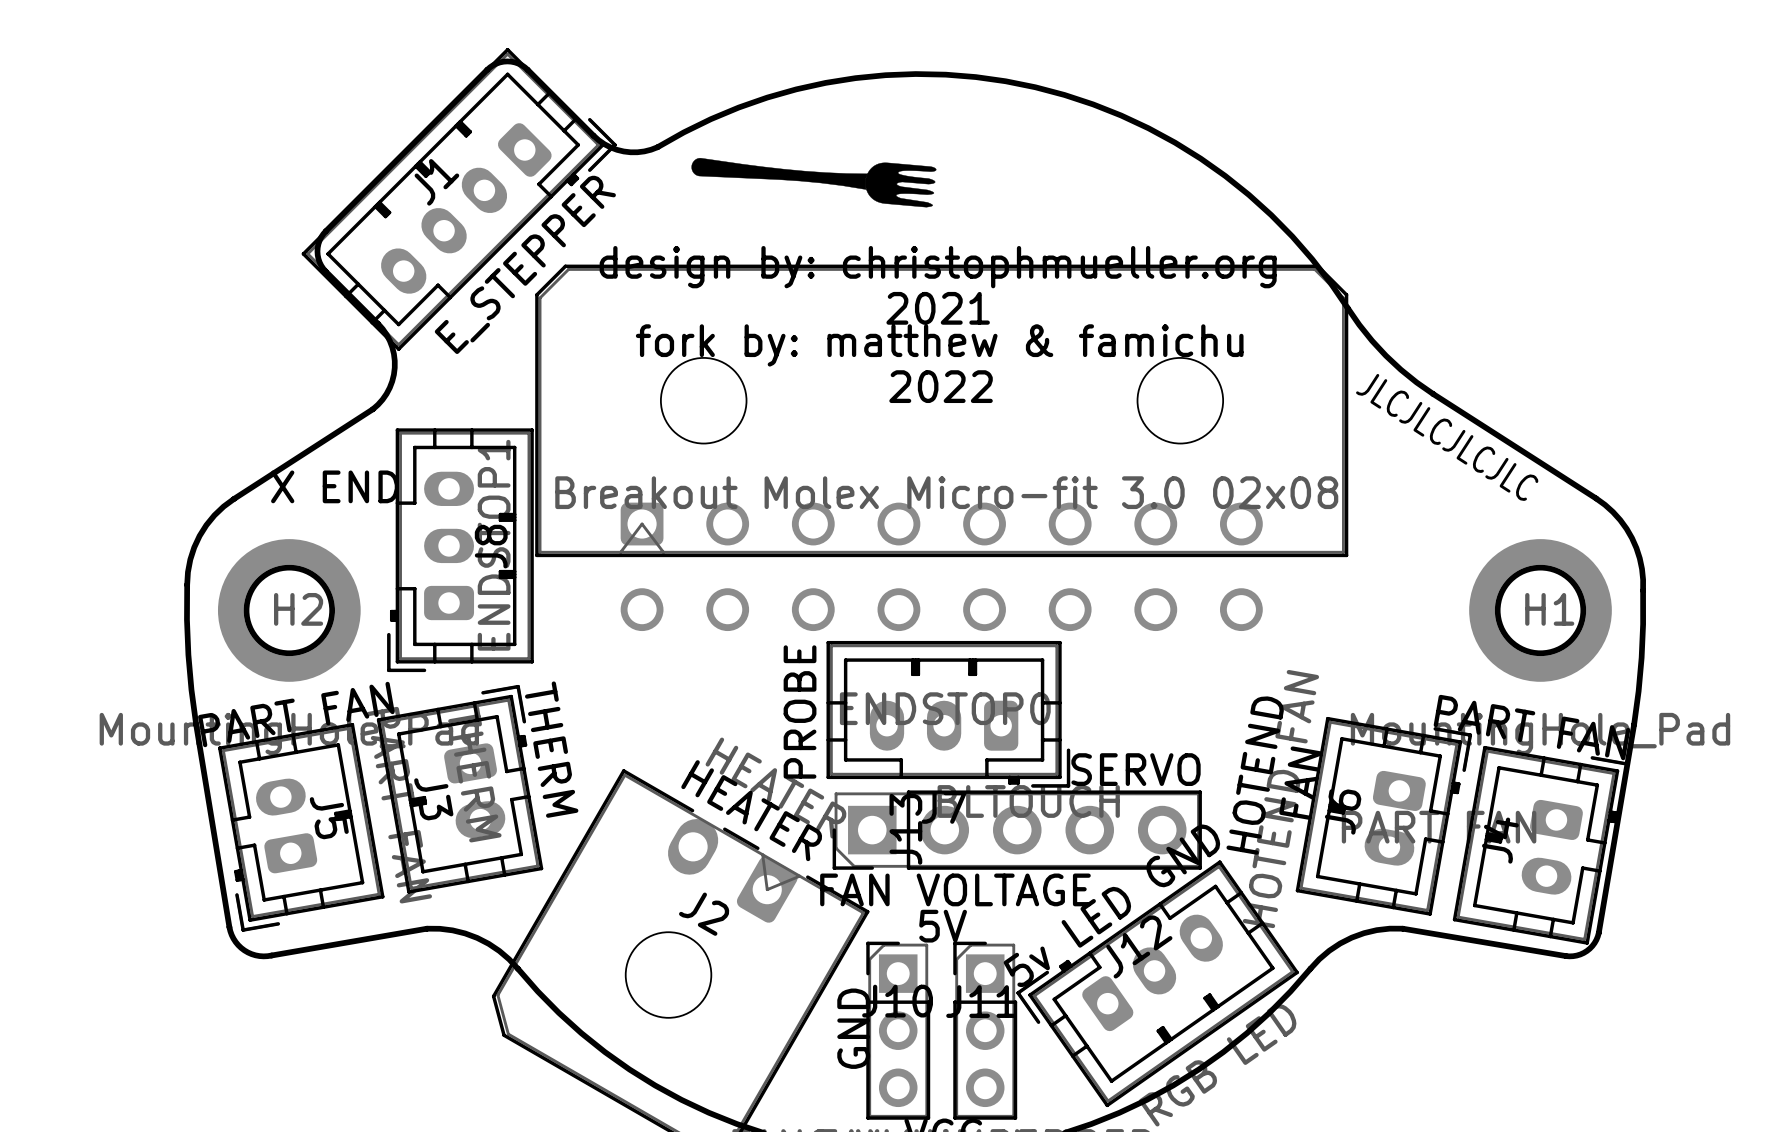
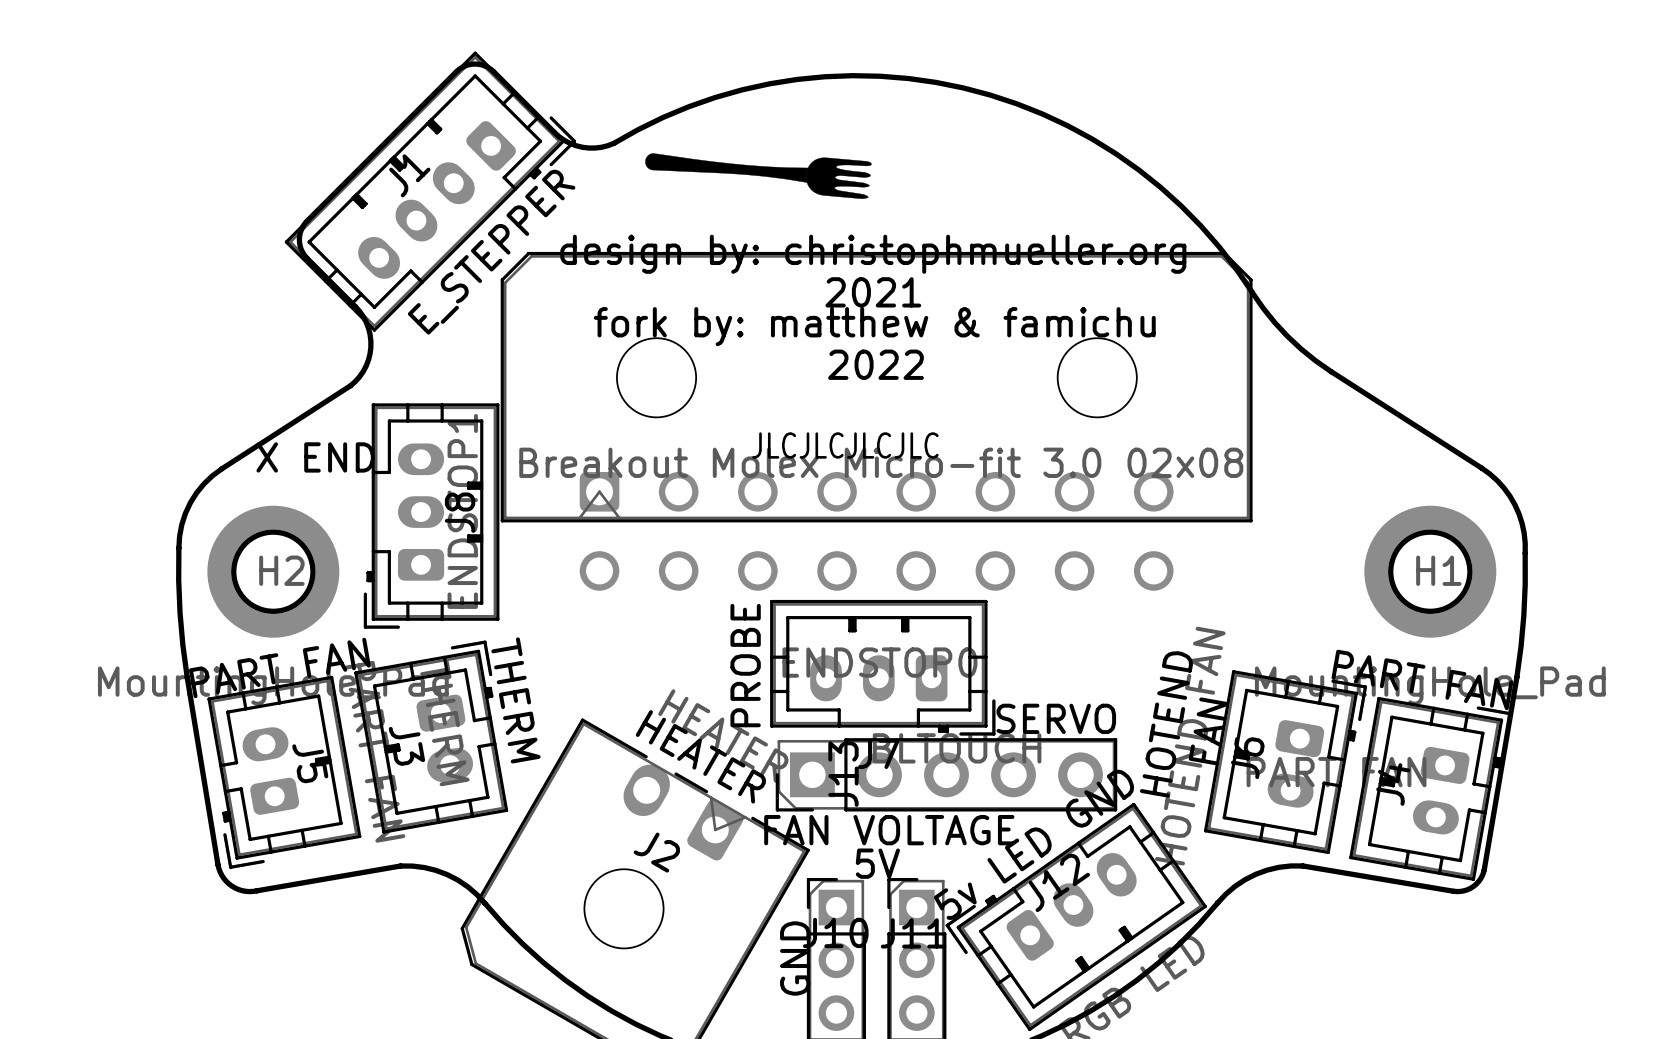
text rotation: 0° (1447, 437) -> 33° counterclockwise (845, 445)
text position: JLCJLCJLCJLC (1447, 437) -> JLCJLCJLCJLC (845, 445)

